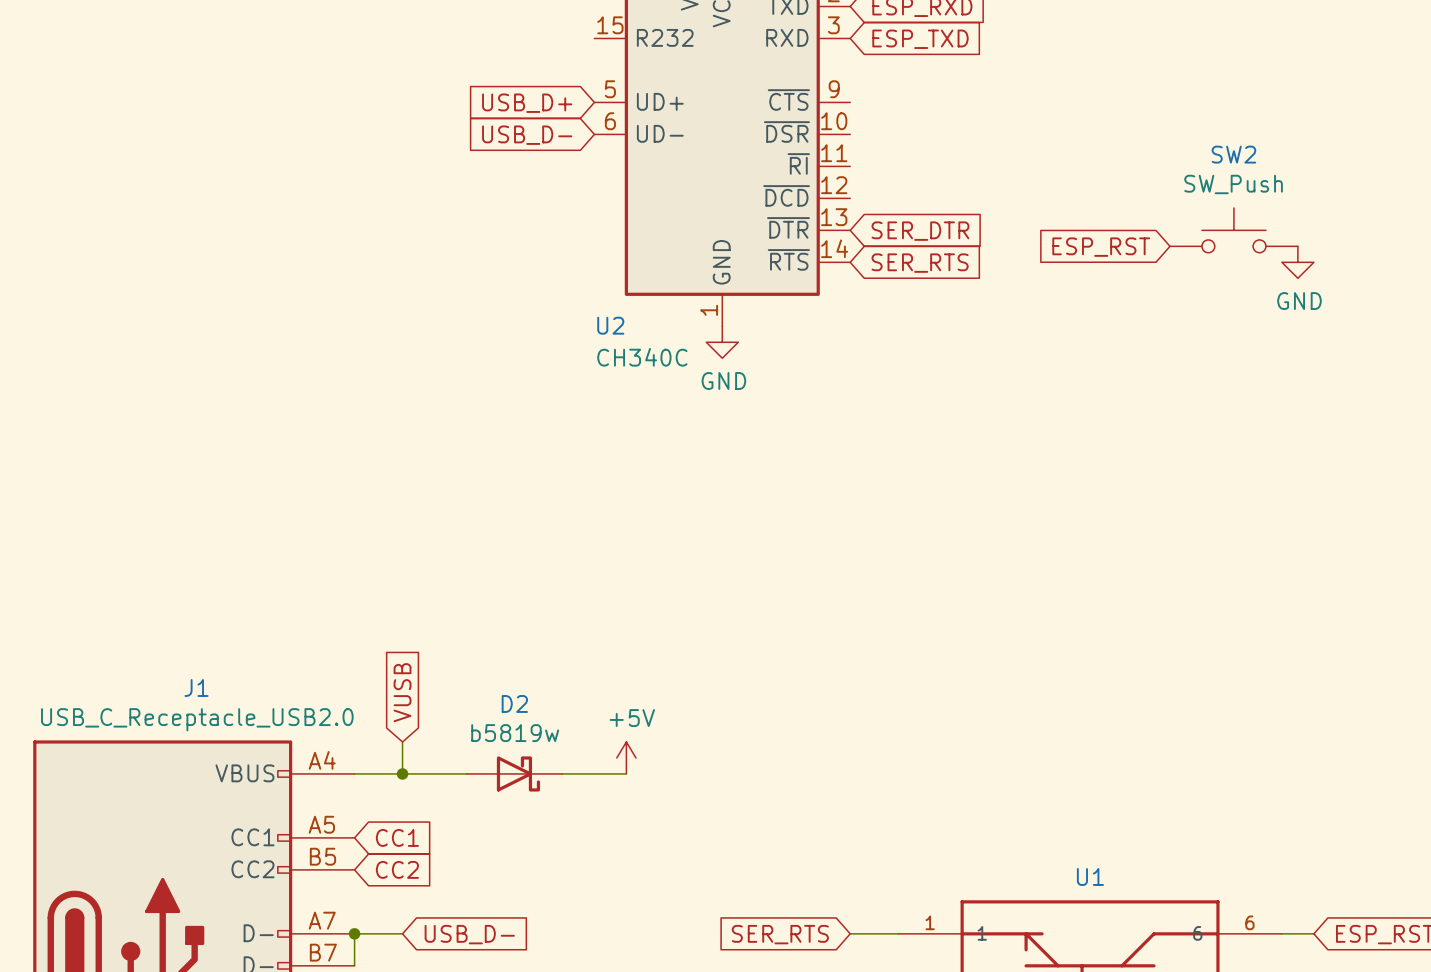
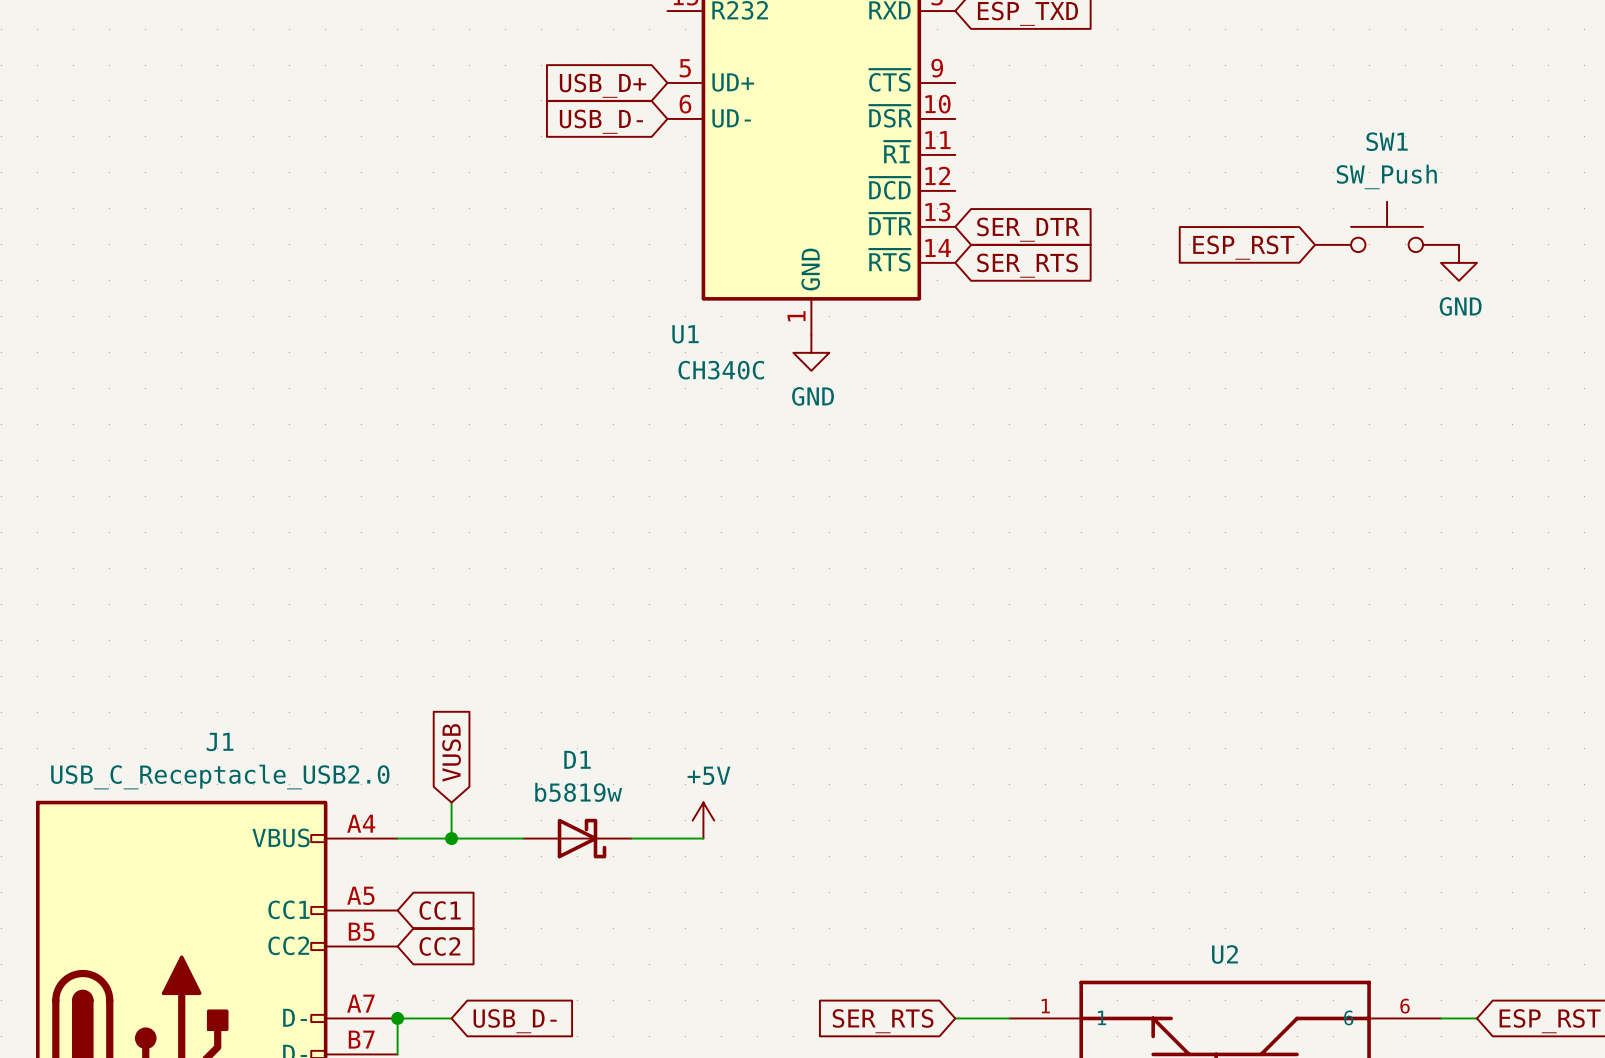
SW2 name: SW2 (1233, 154) -> SW1 (1387, 141)
U2 name: U2 (610, 325) -> U1 (685, 334)
D2 name: D2 (514, 703) -> D1 (577, 759)
U1 name: U1 (1090, 876) -> U2 (1224, 954)

